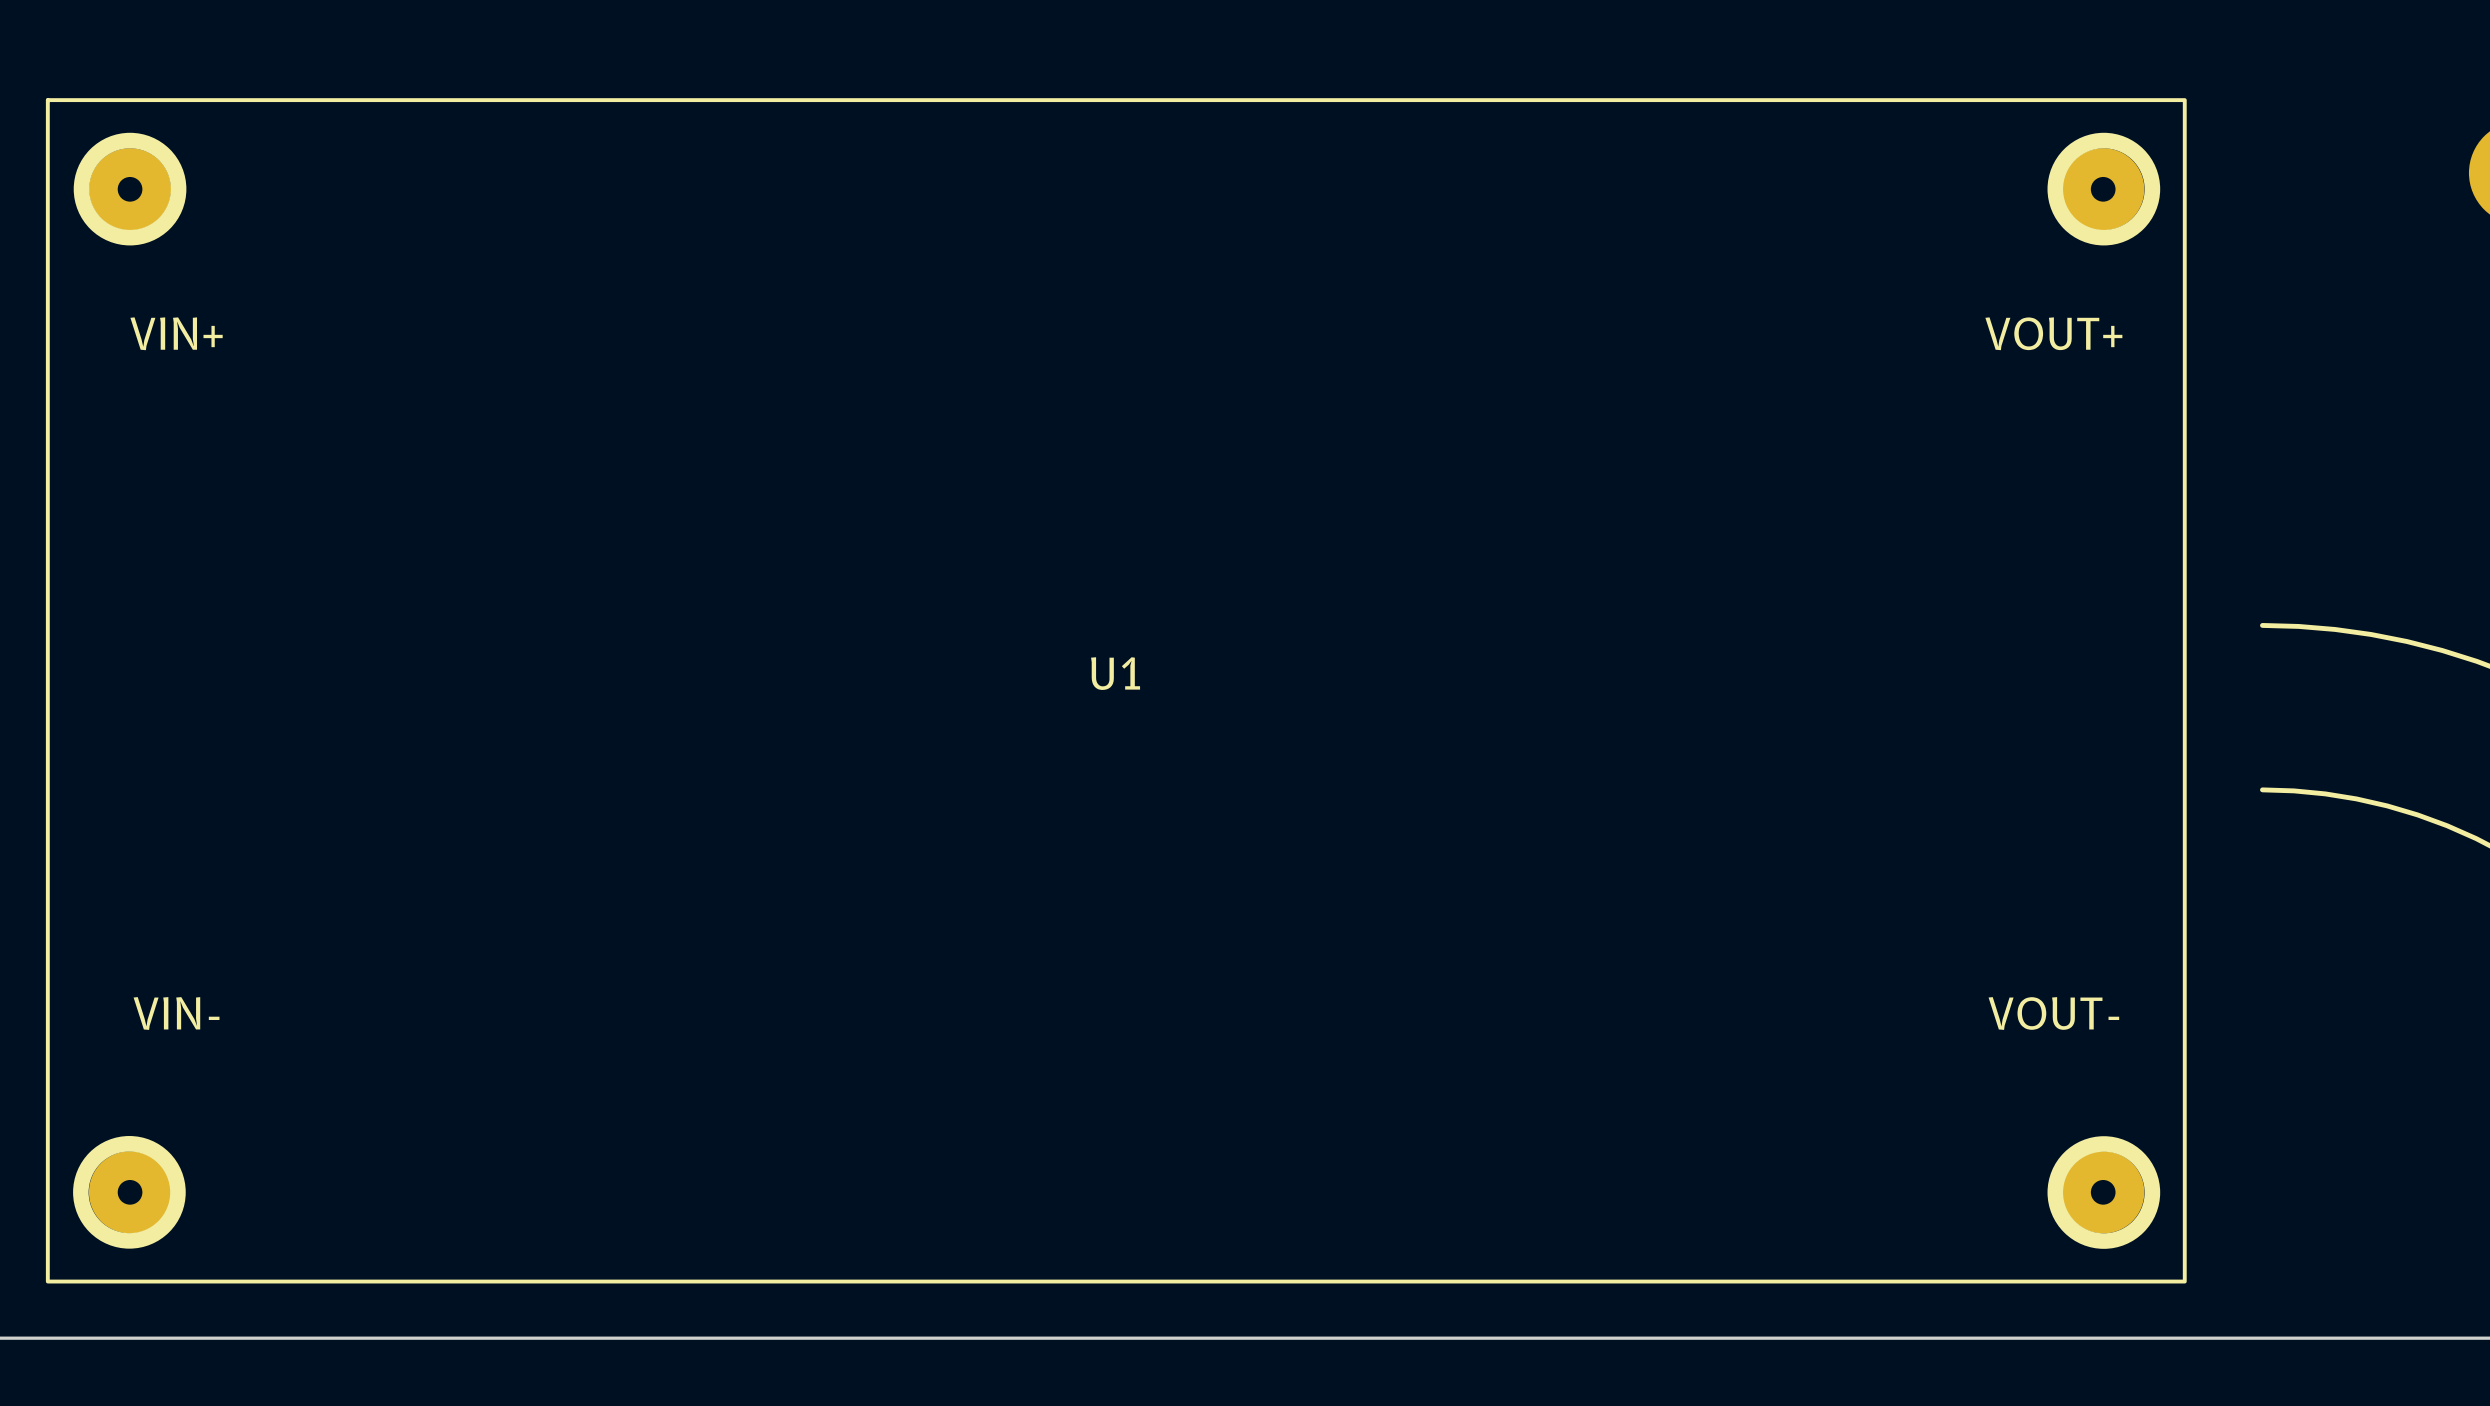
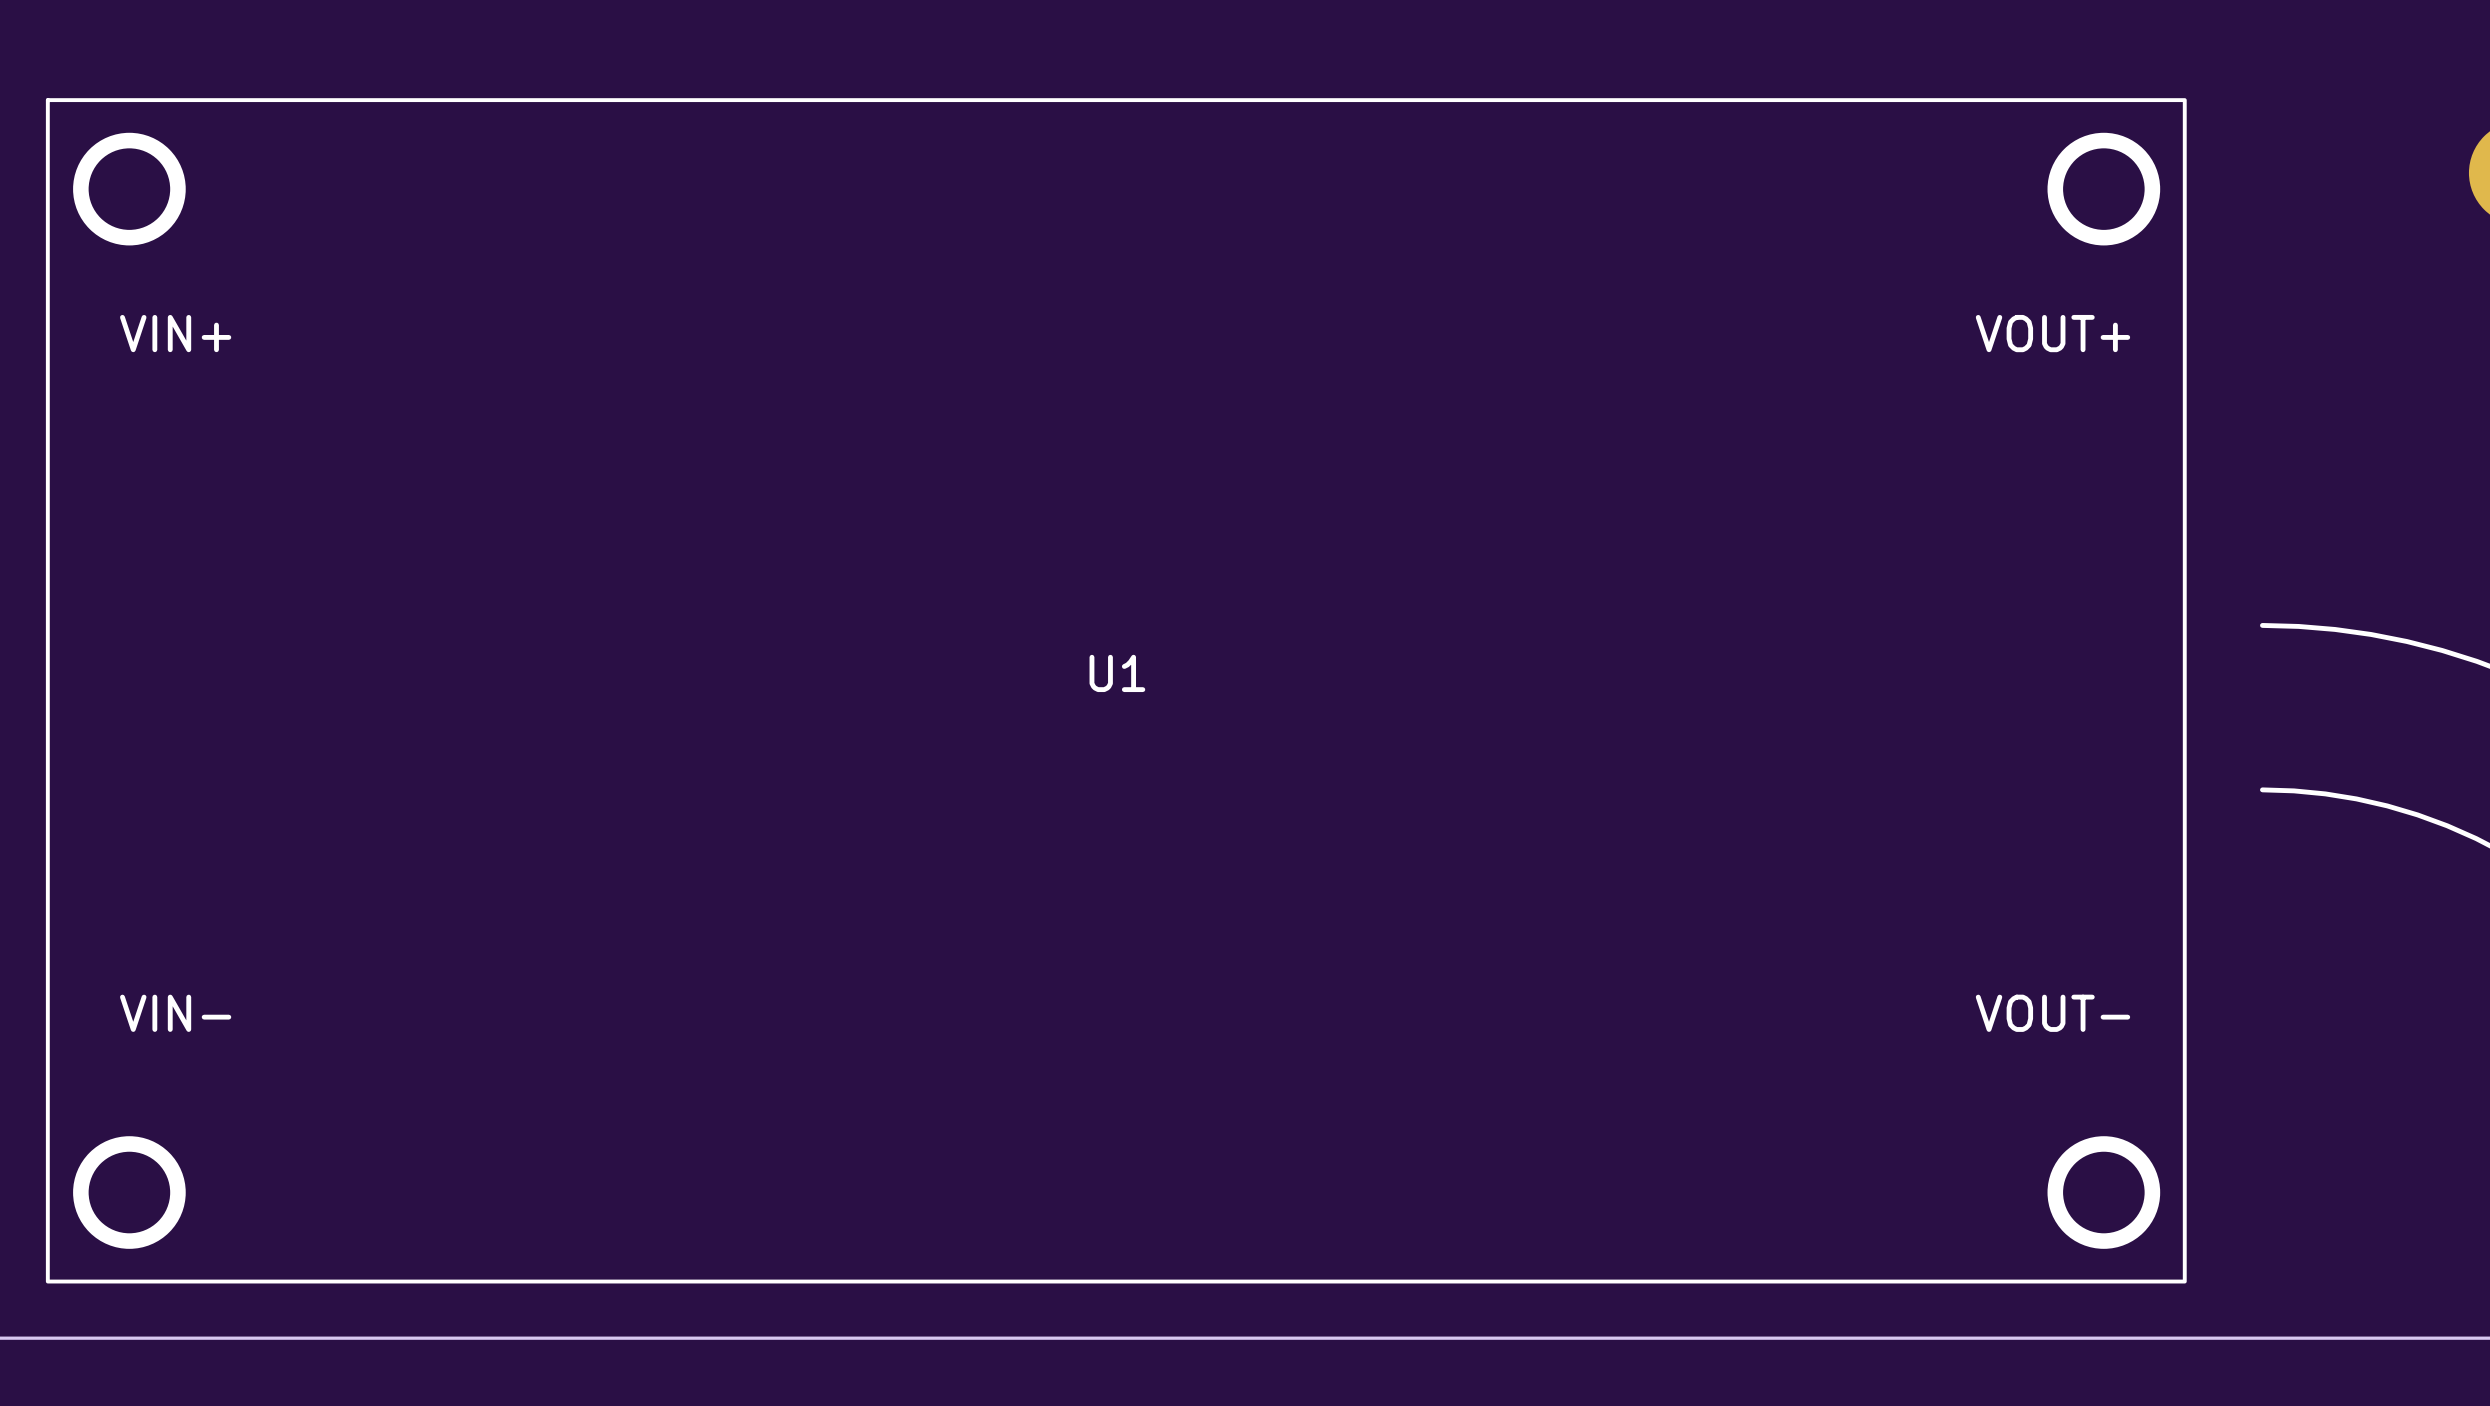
U1 footprint: [45, 98, 2187, 1284] -> [45, 98, 2187, 1284]

